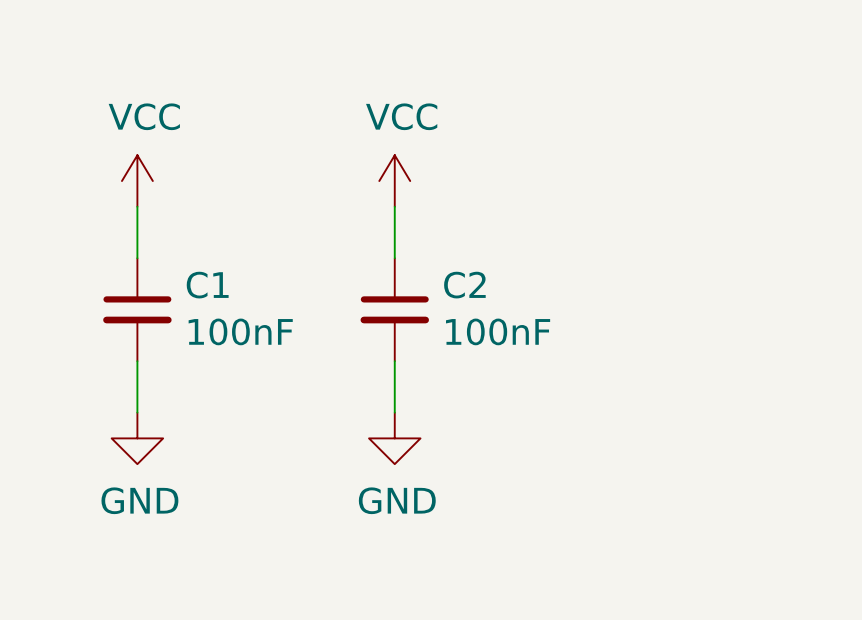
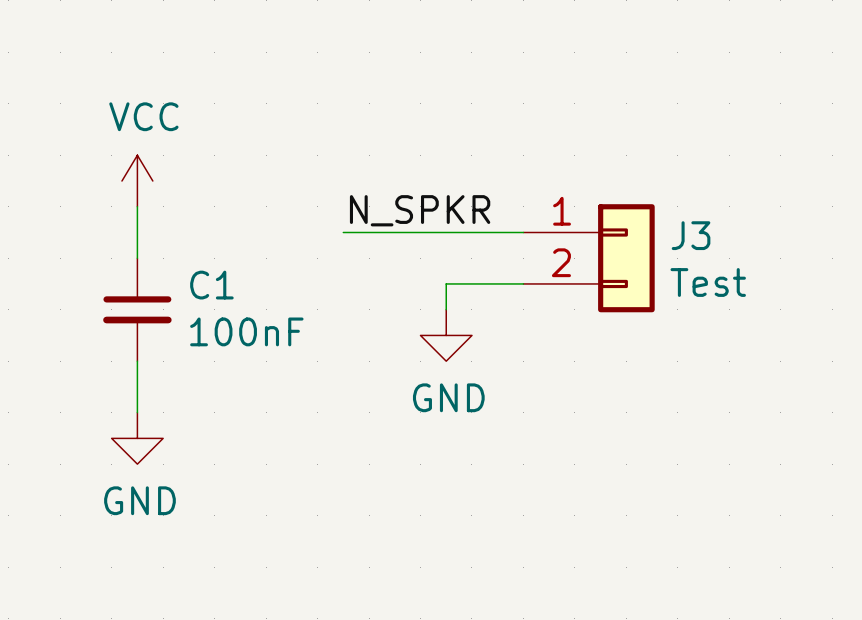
power symbol: VCC (394, 181) -> none
wire: (394, 206) (394, 258) -> none
label: none -> N_SPKR (420, 210)
wire: none -> (343, 232) (523, 232)
J3: none -> Test (589, 258)
wire: none -> (523, 283) (446, 283) (446, 309)
C2: 100nF (394, 309) -> none
wire: (394, 361) (394, 412) -> none
power symbol position: GND (394, 438) -> GND (446, 335)

